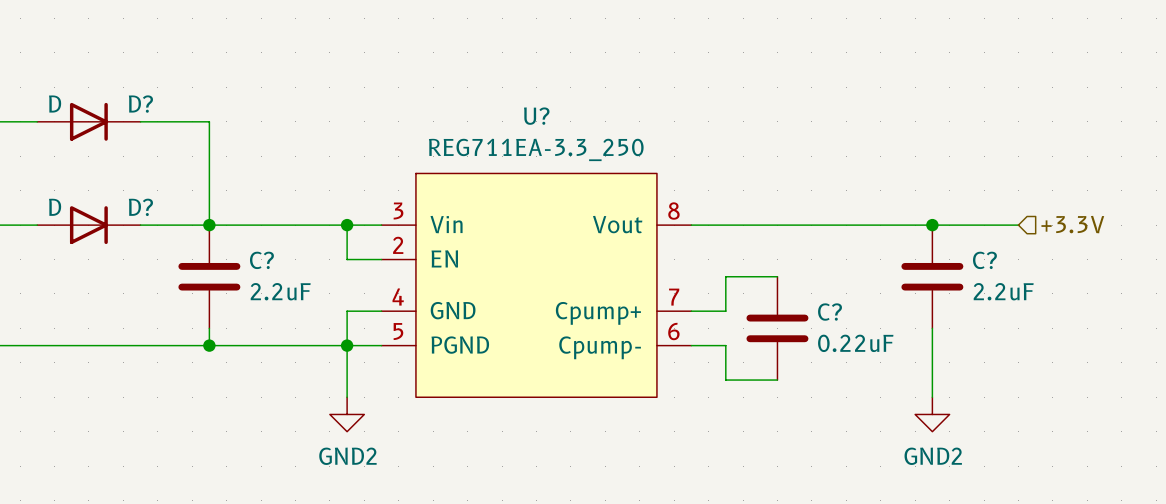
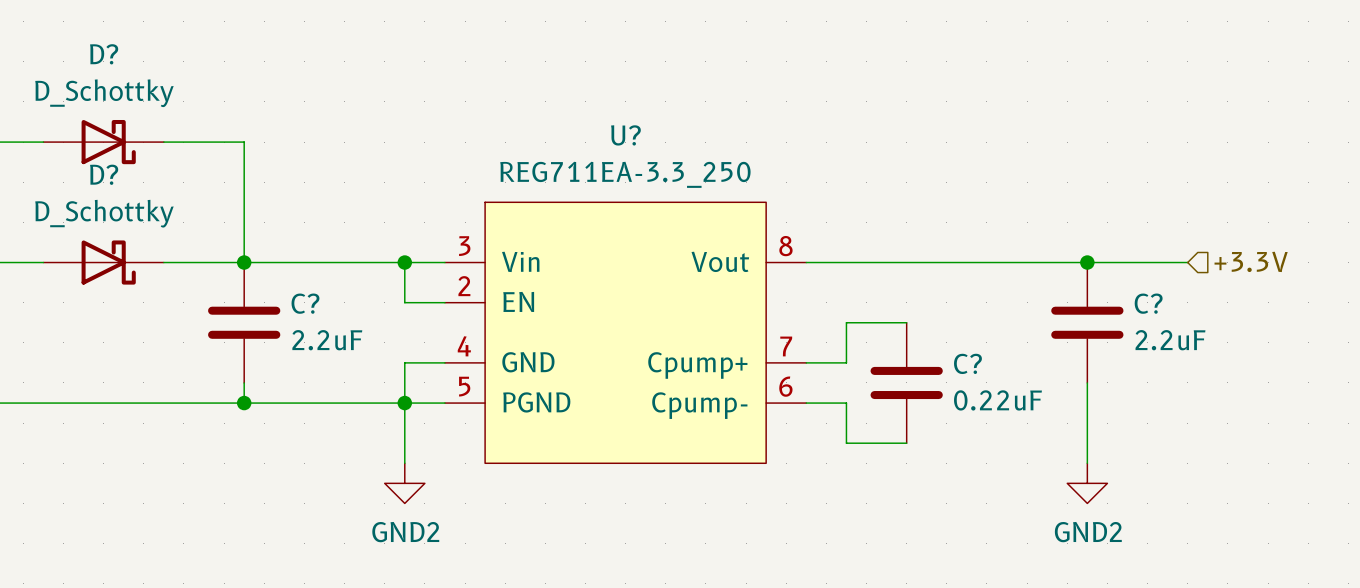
D? symbol: [37, 102, 141, 141] -> [43, 119, 164, 165]
D? value: D (55, 104) -> D_Schottky (104, 93)
D? name position: D? (140, 104) -> D? (104, 54)
D? symbol: [37, 206, 141, 245] -> [43, 240, 164, 285]
D? value: D (55, 207) -> D_Schottky (104, 213)
D? name position: D? (140, 207) -> D? (104, 174)

